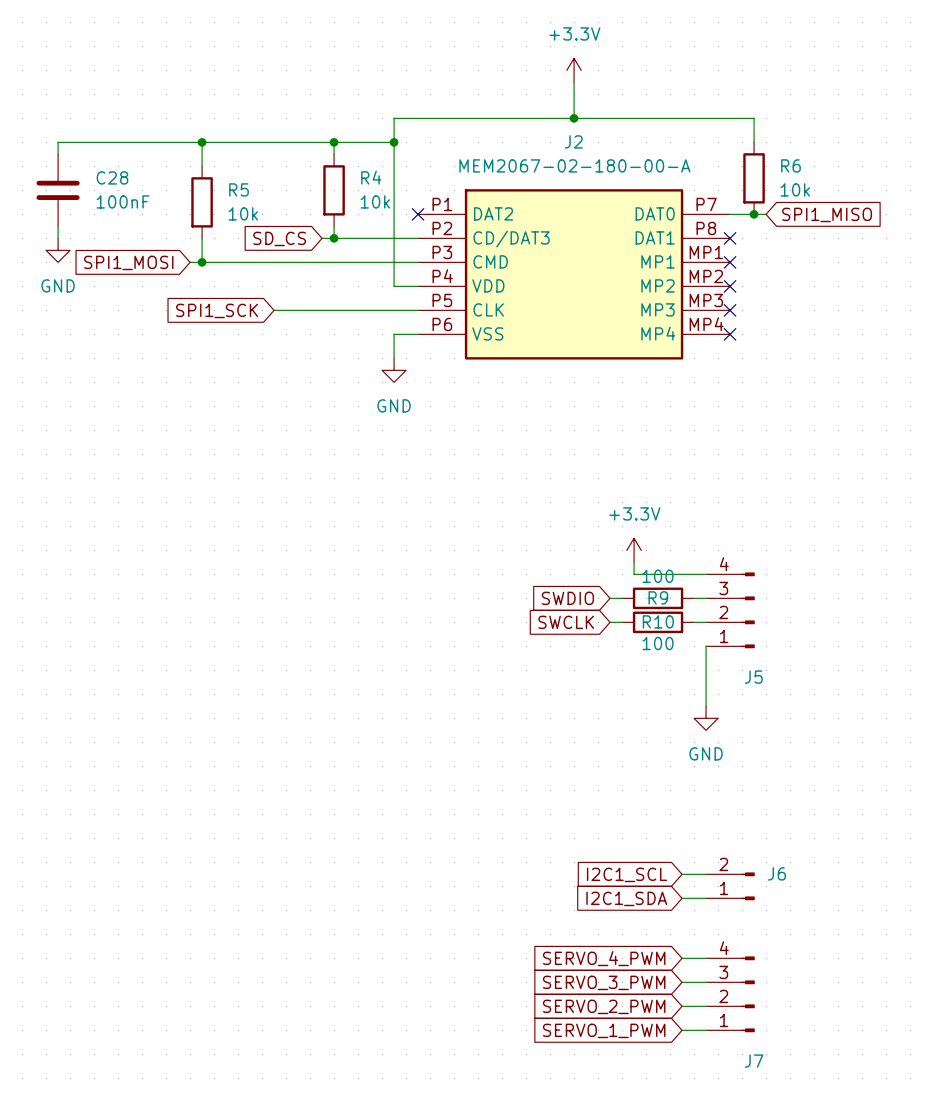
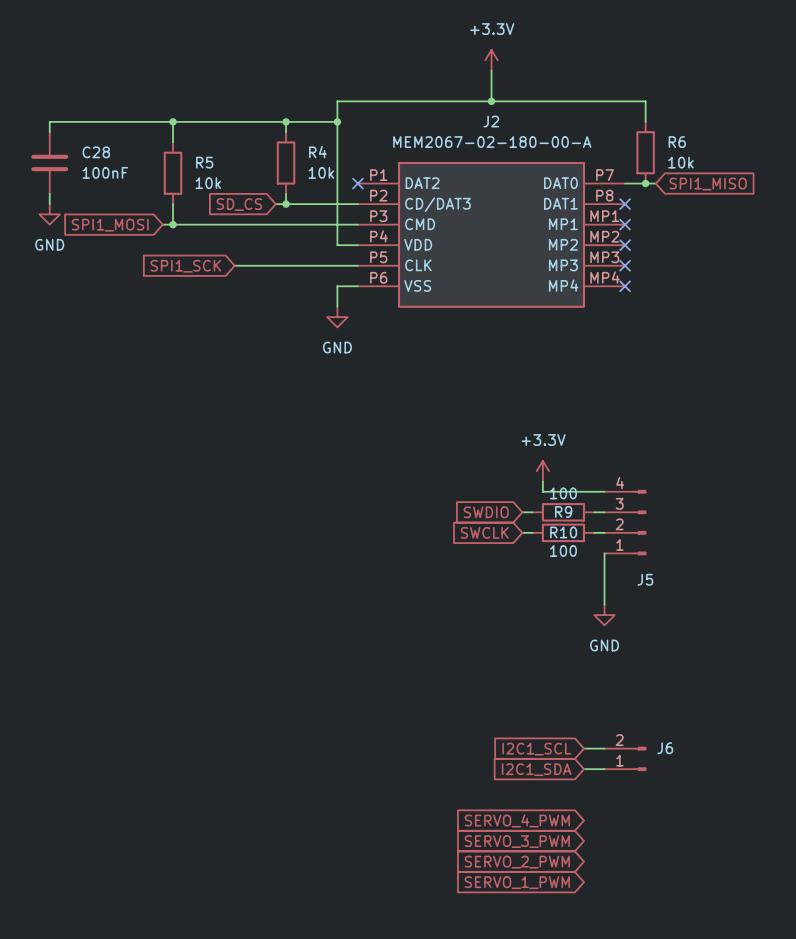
wire: (682, 958) (706, 958) -> none
wire: (682, 982) (706, 982) -> none
J7: (730, 994) -> none
wire: (682, 1006) (706, 1006) -> none
wire: (682, 1030) (706, 1030) -> none

